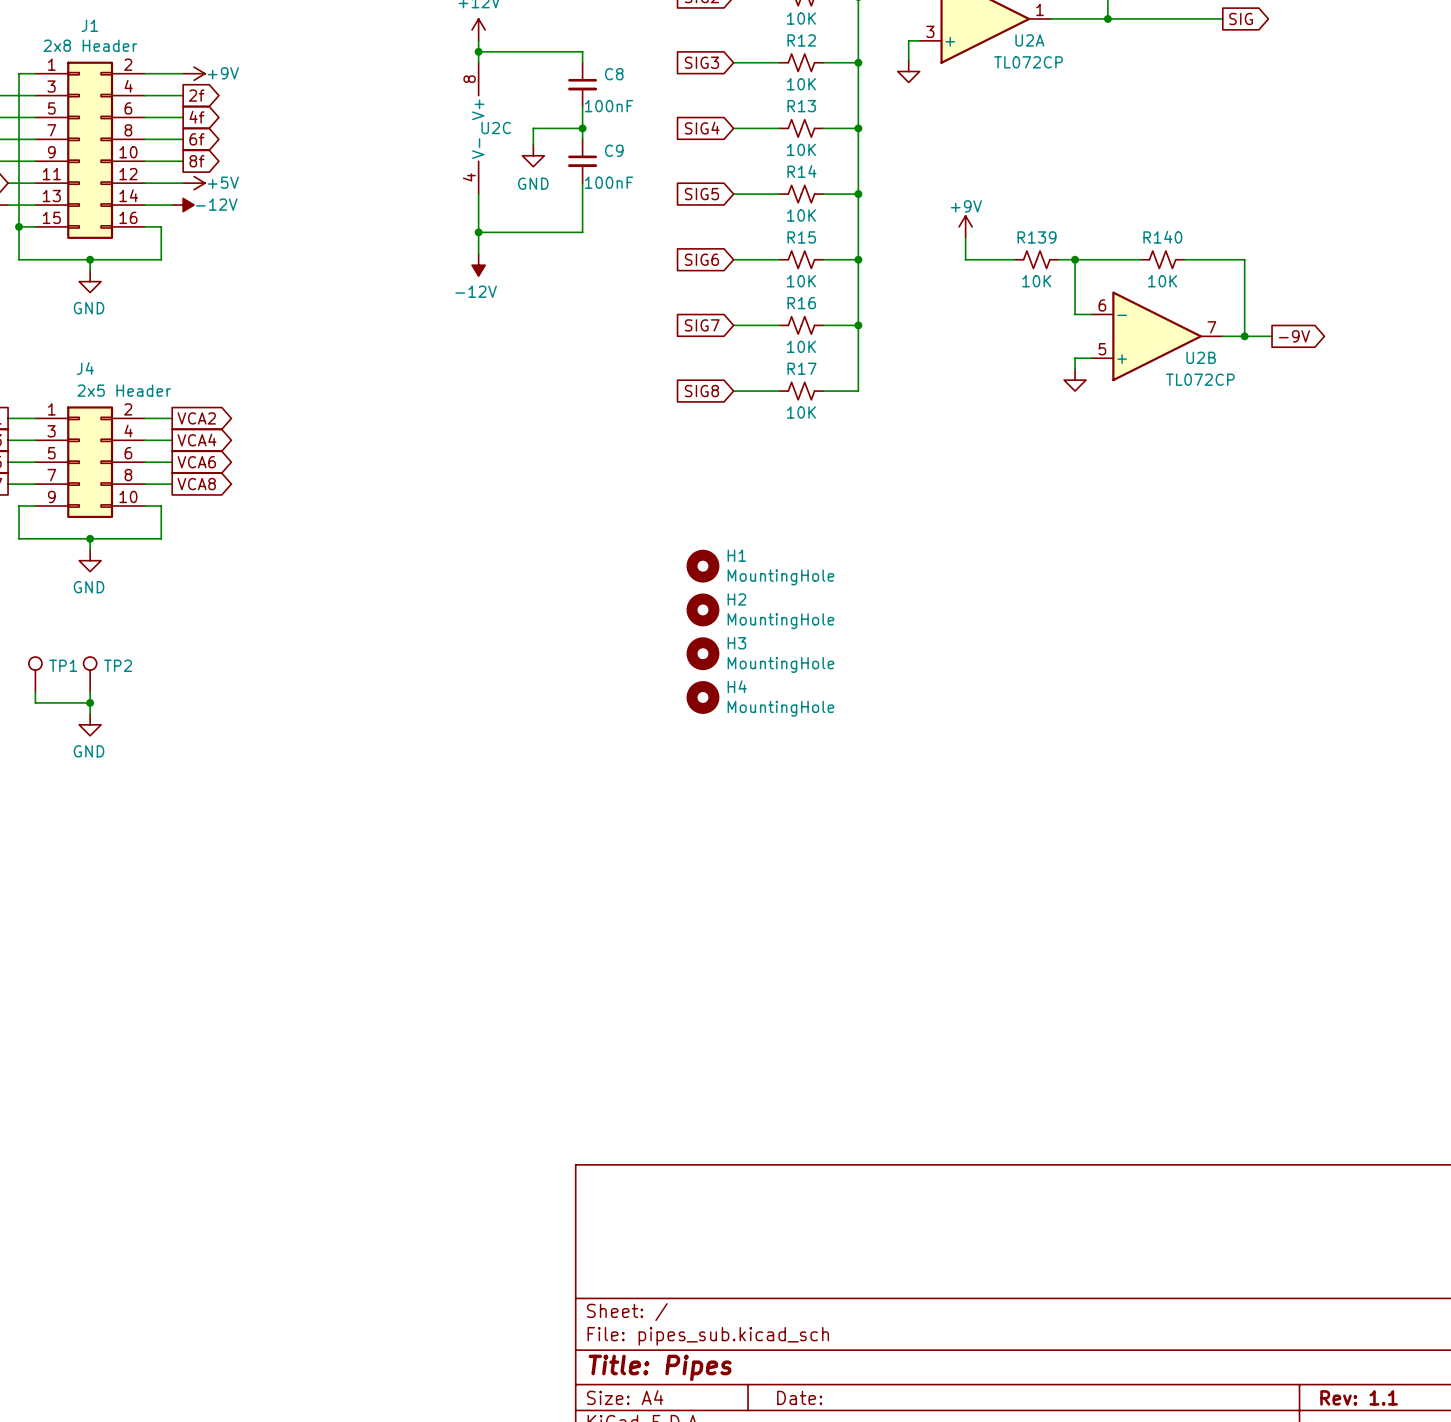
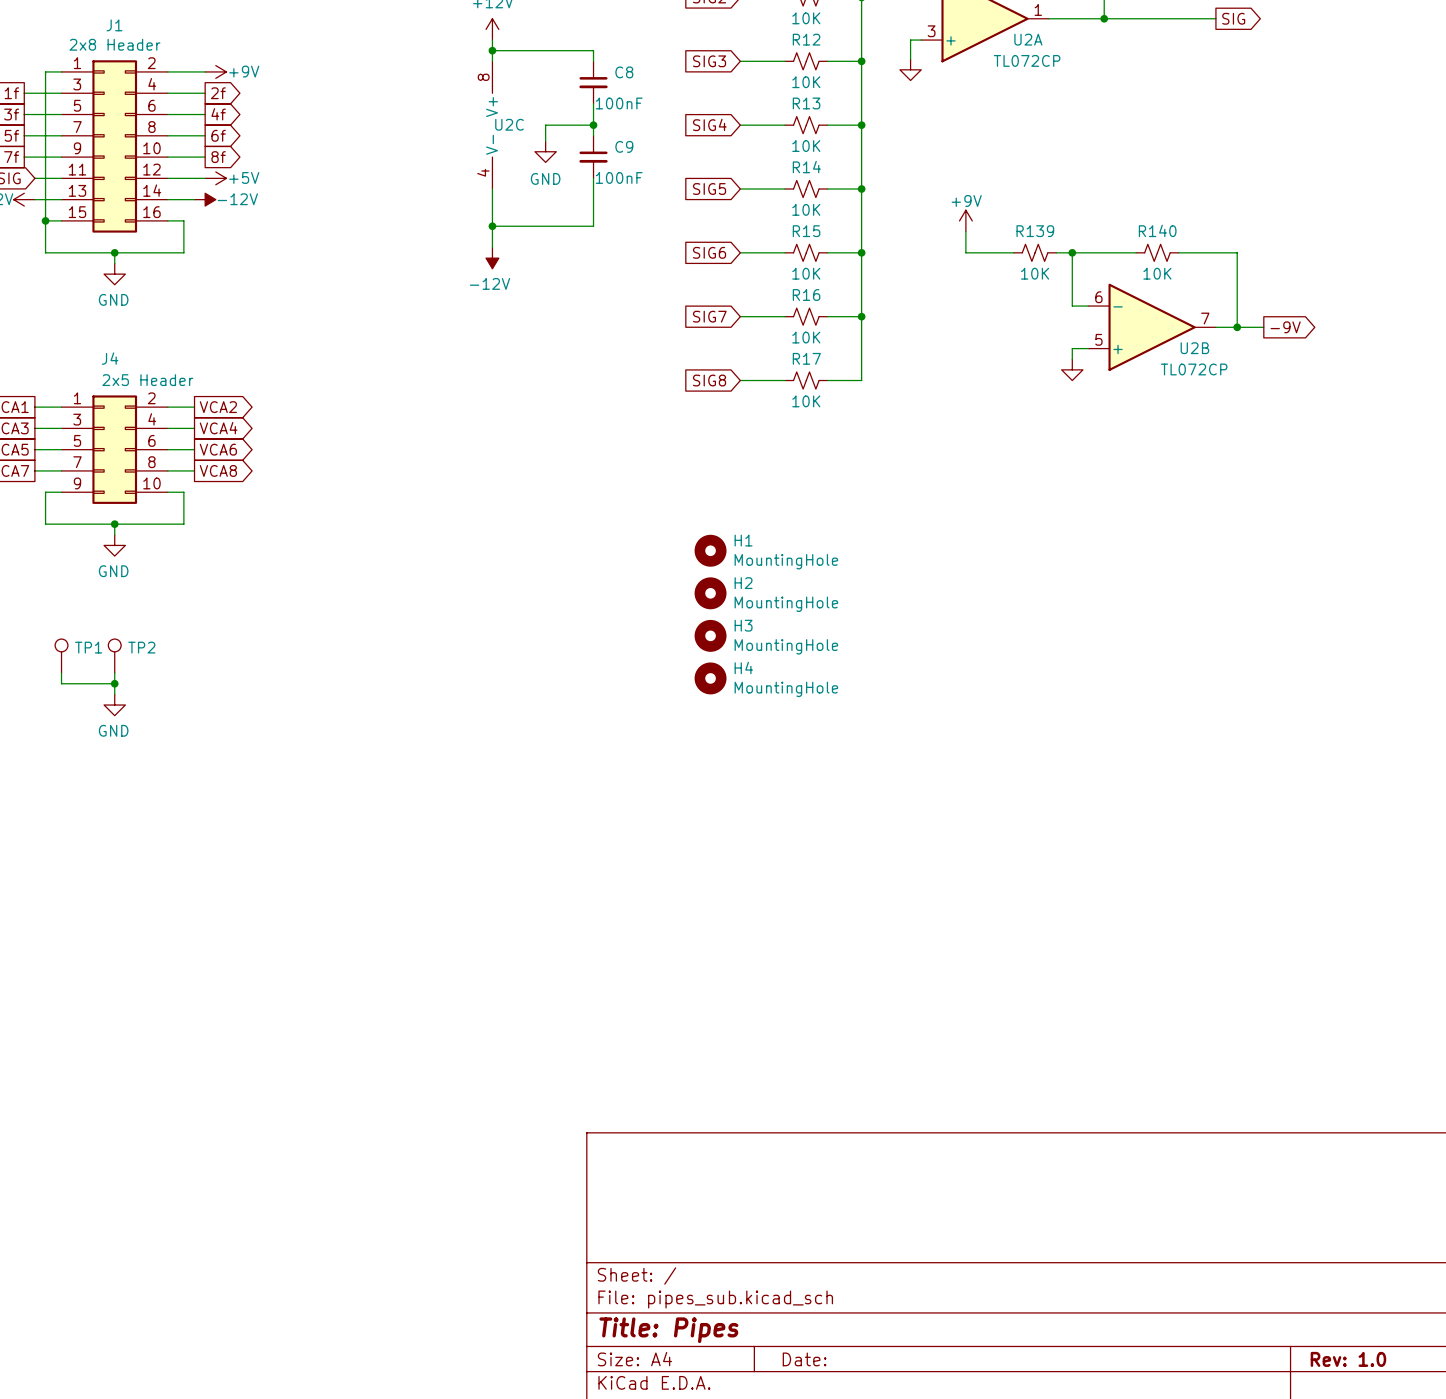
title block: Rev: 1.1 (1359, 1397) -> Rev: 1.0 (1348, 1359)

